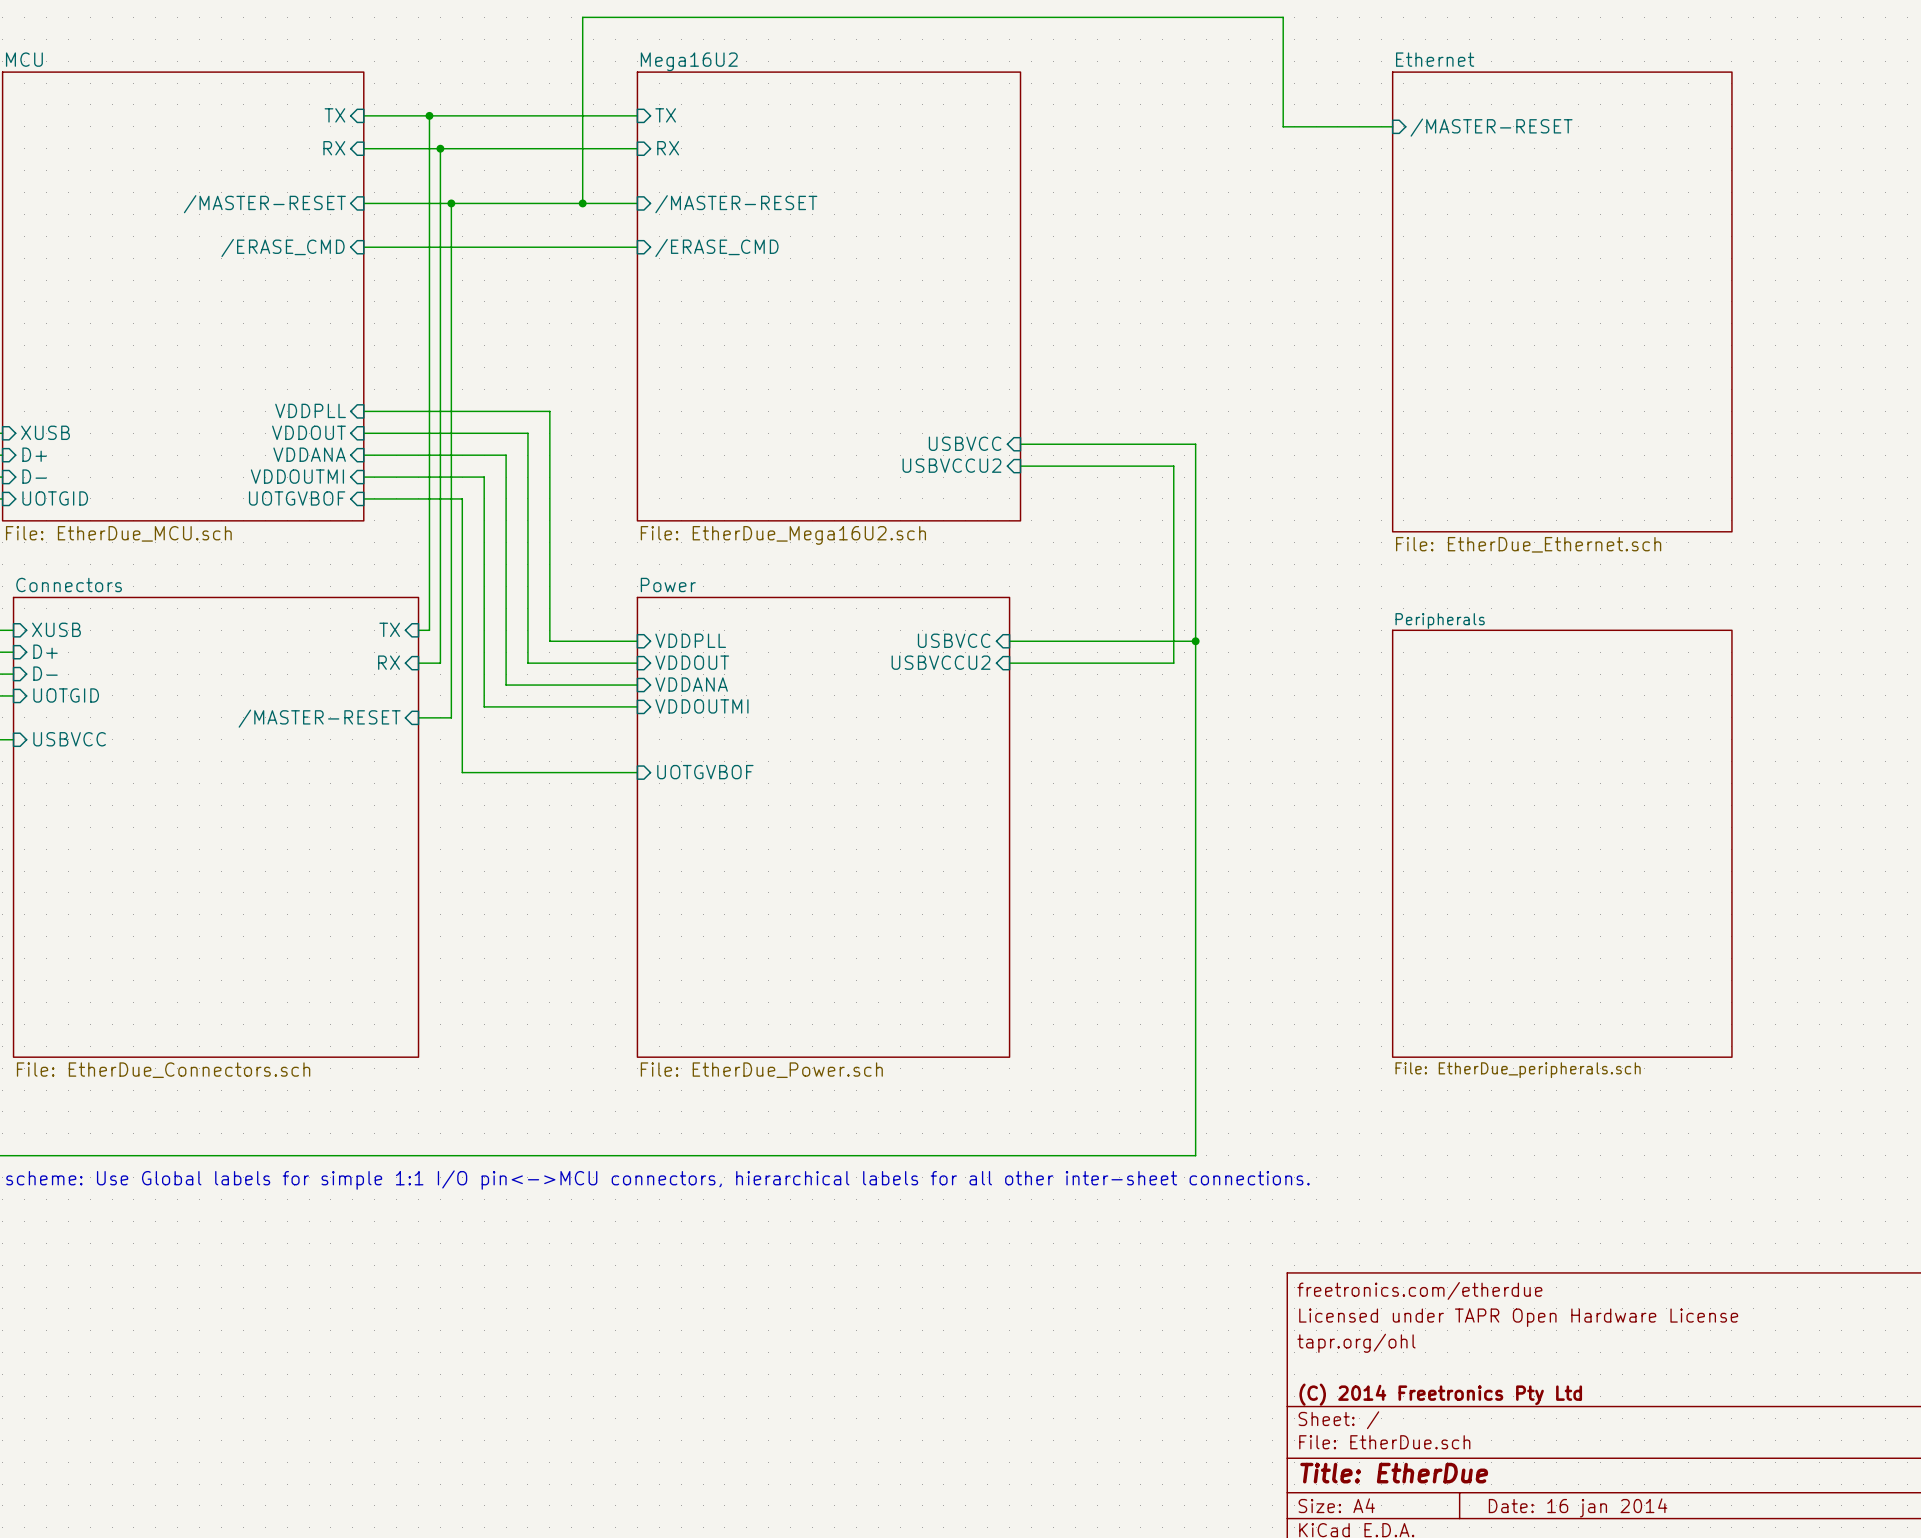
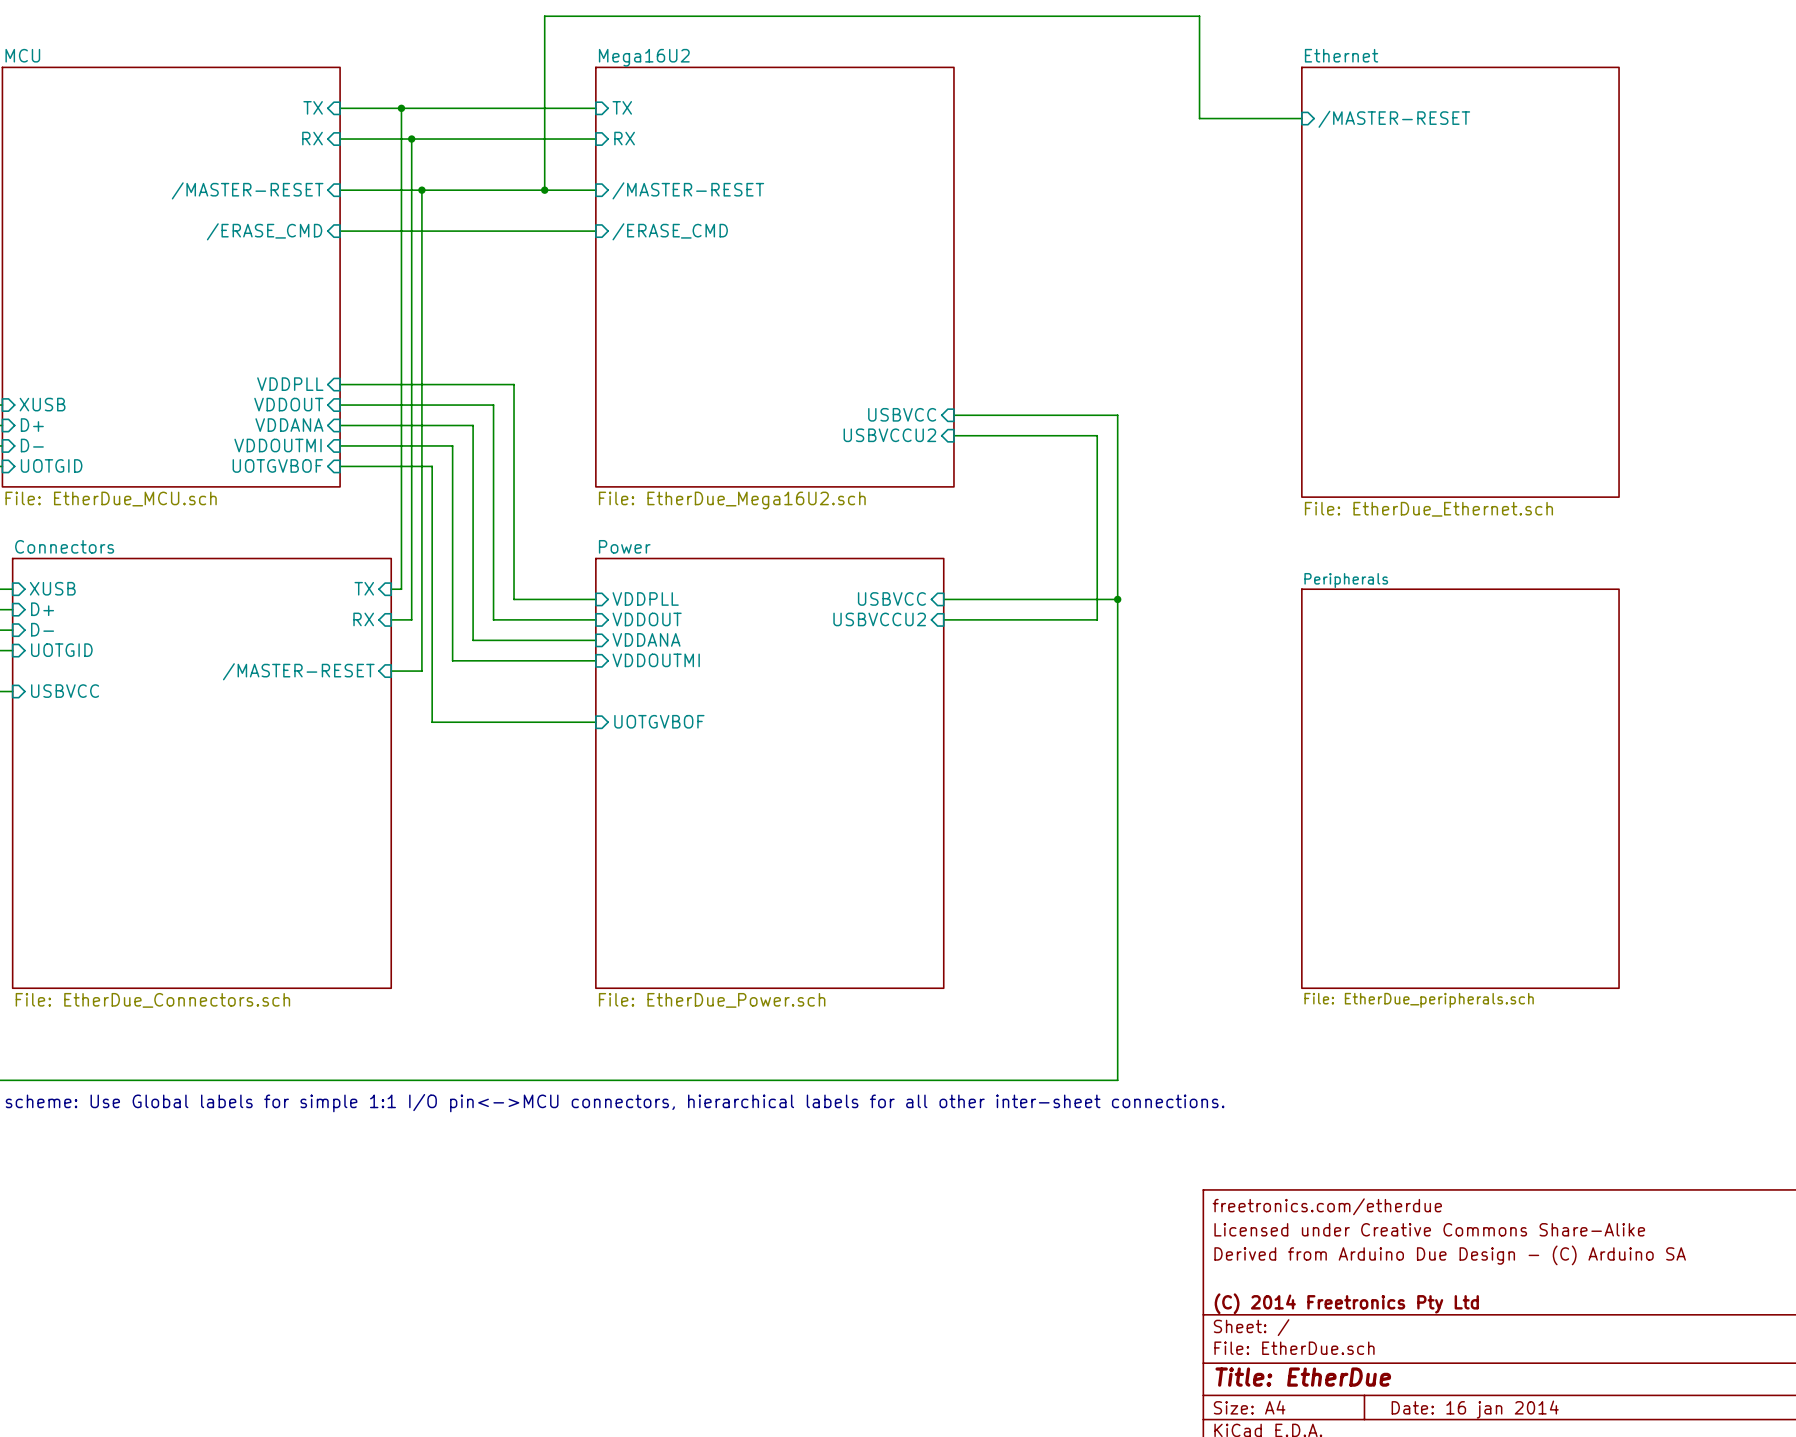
title block: Licensed under TAPR Open Hardware License (1518, 1317) -> Licensed under Creative Commons Share-Alike (1429, 1229)
title block: tapr.org/ohl (1356, 1343) -> Derived from Arduino Due Design - (C) Arduino SA (1450, 1255)

